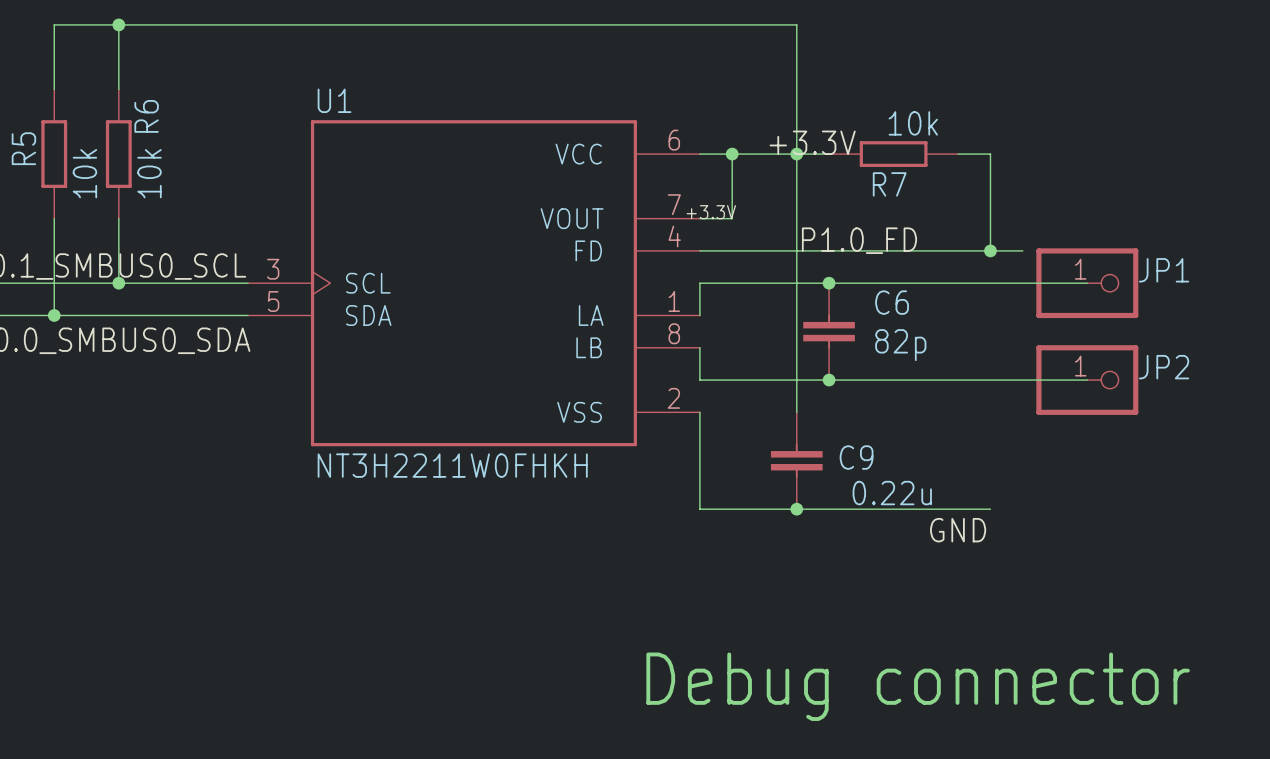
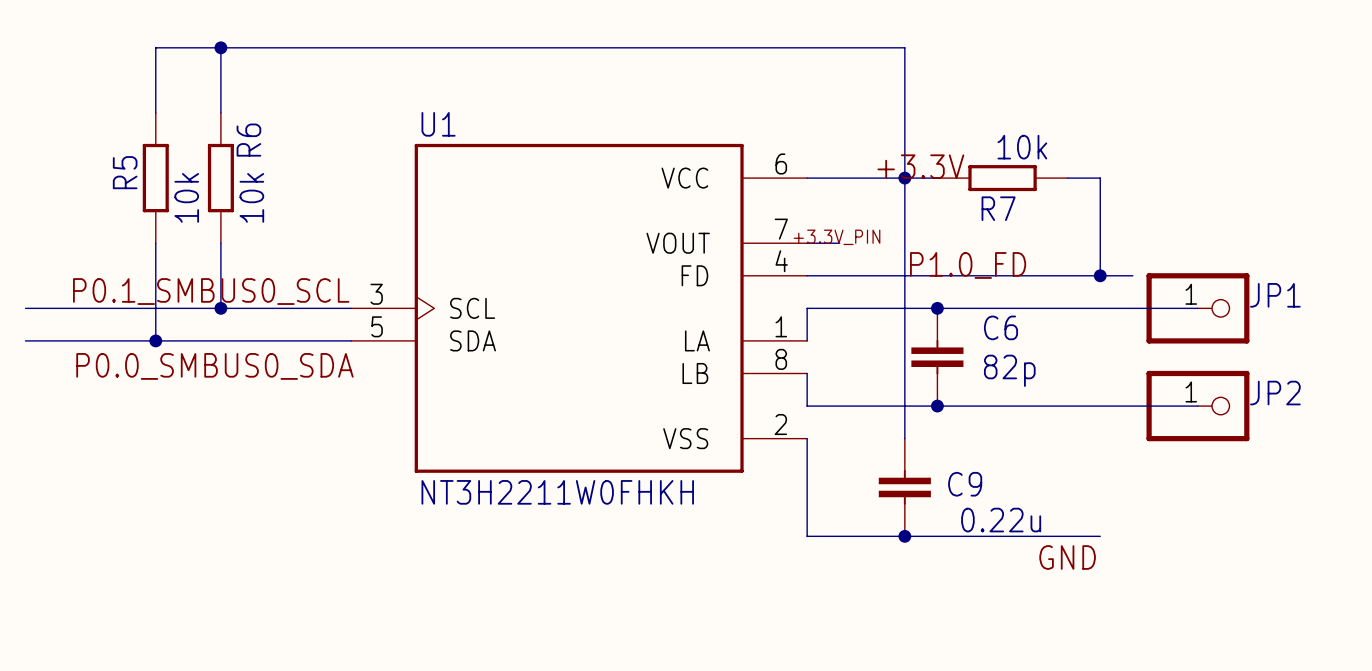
wire: (732, 154) (732, 218) -> none
junction: (732, 154) -> none
label: +3.3V (711, 212) -> +3.3V_PIN (837, 237)

